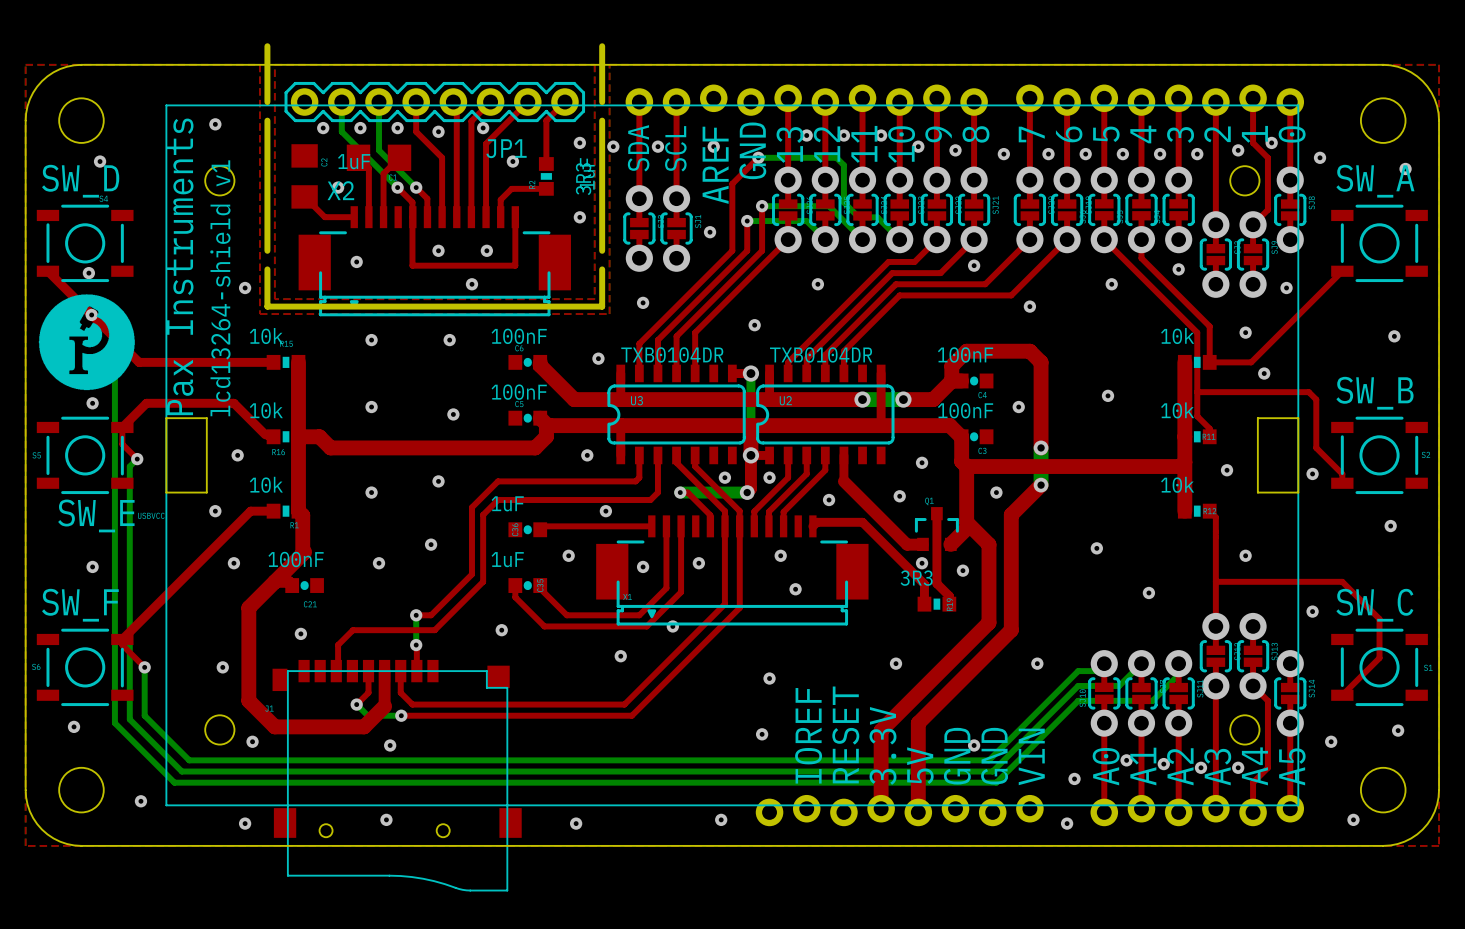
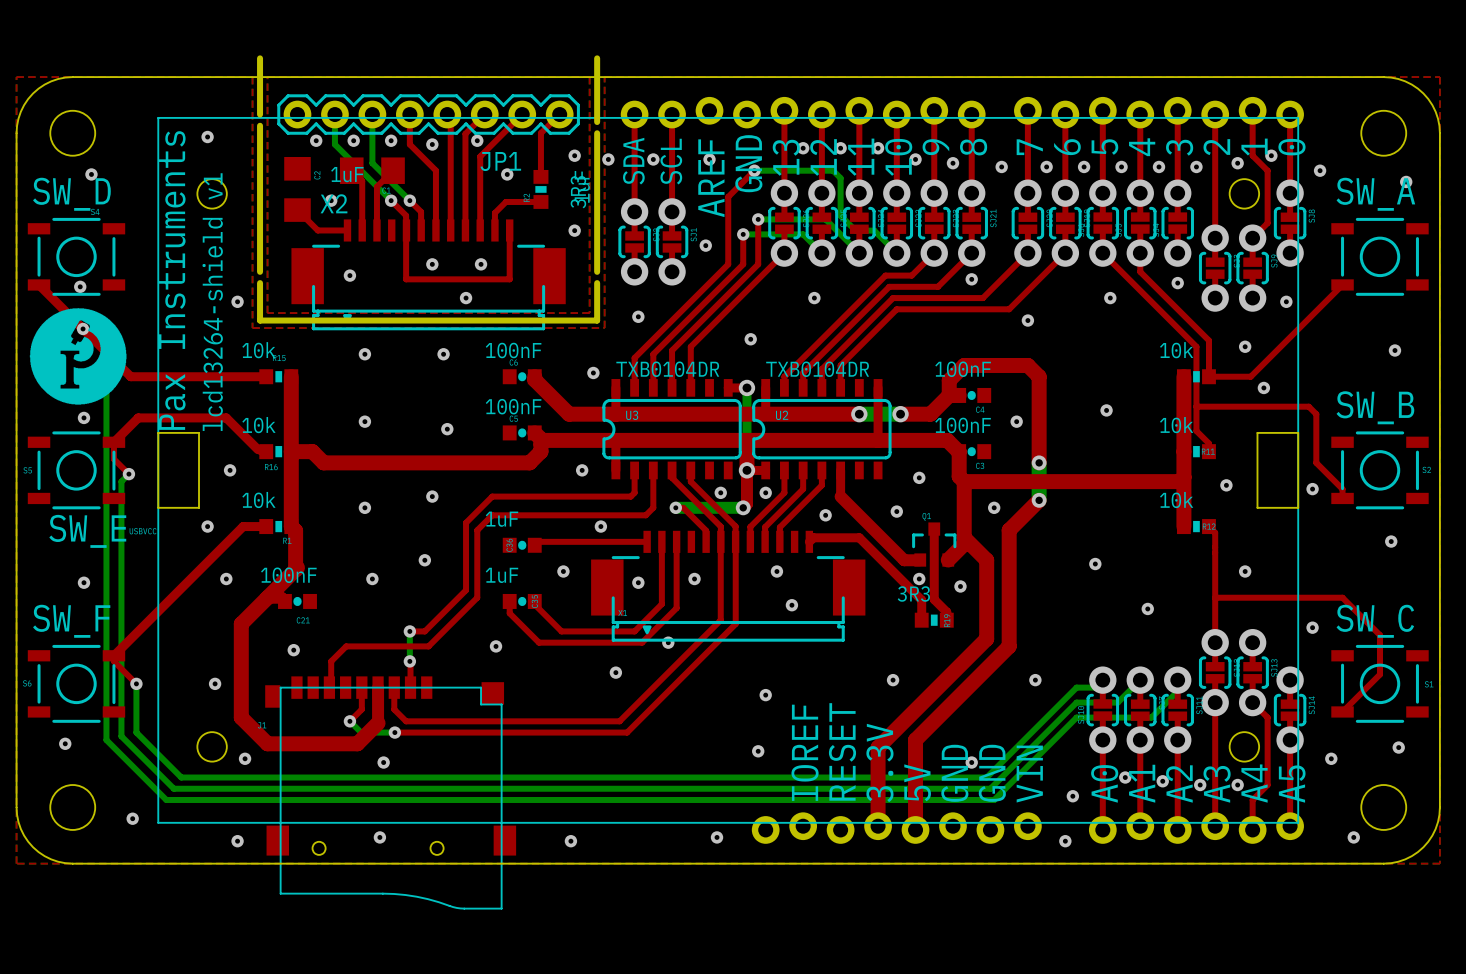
board edge: none -> (597, 114) (597, 122)
board edge: none -> (260, 125) (260, 133)
board edge: none -> (260, 264) (260, 271)
board edge: none -> (597, 264) (597, 271)

